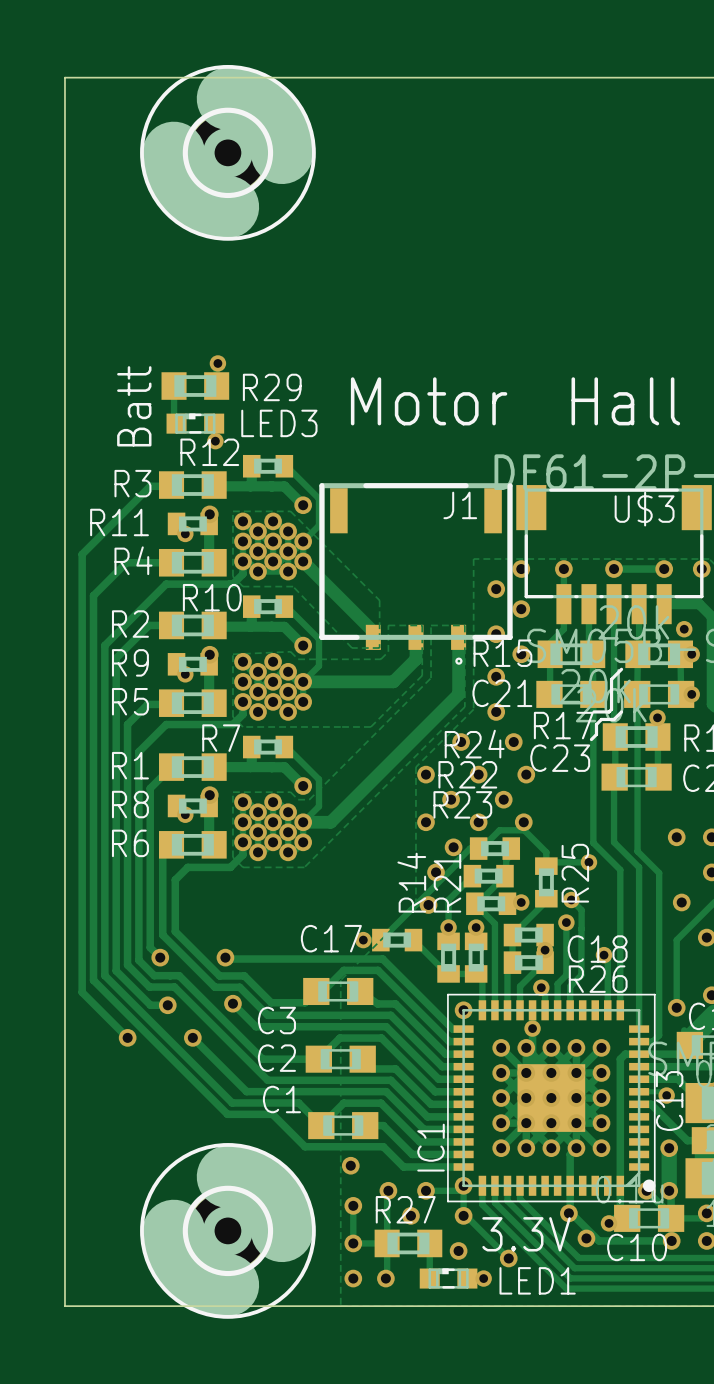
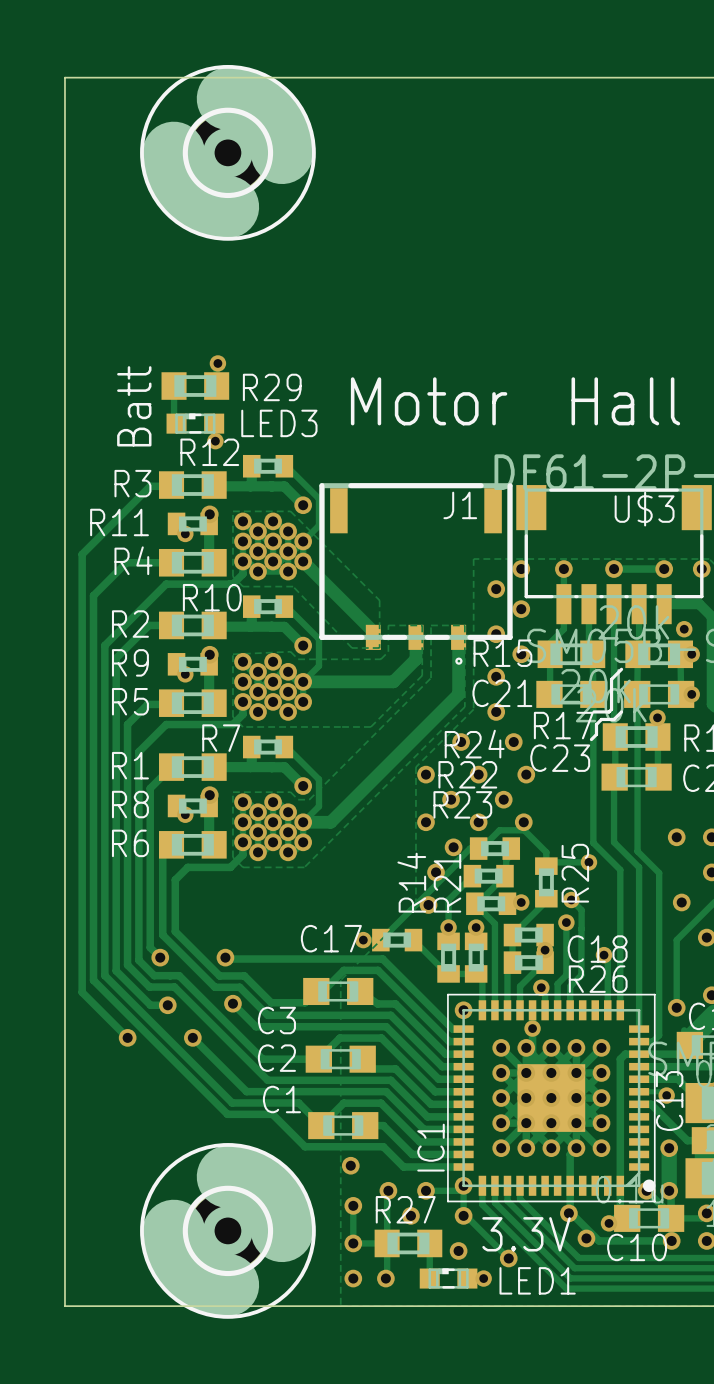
J1 footprint: [319, 483, 513, 665] -> [319, 483, 513, 665]

